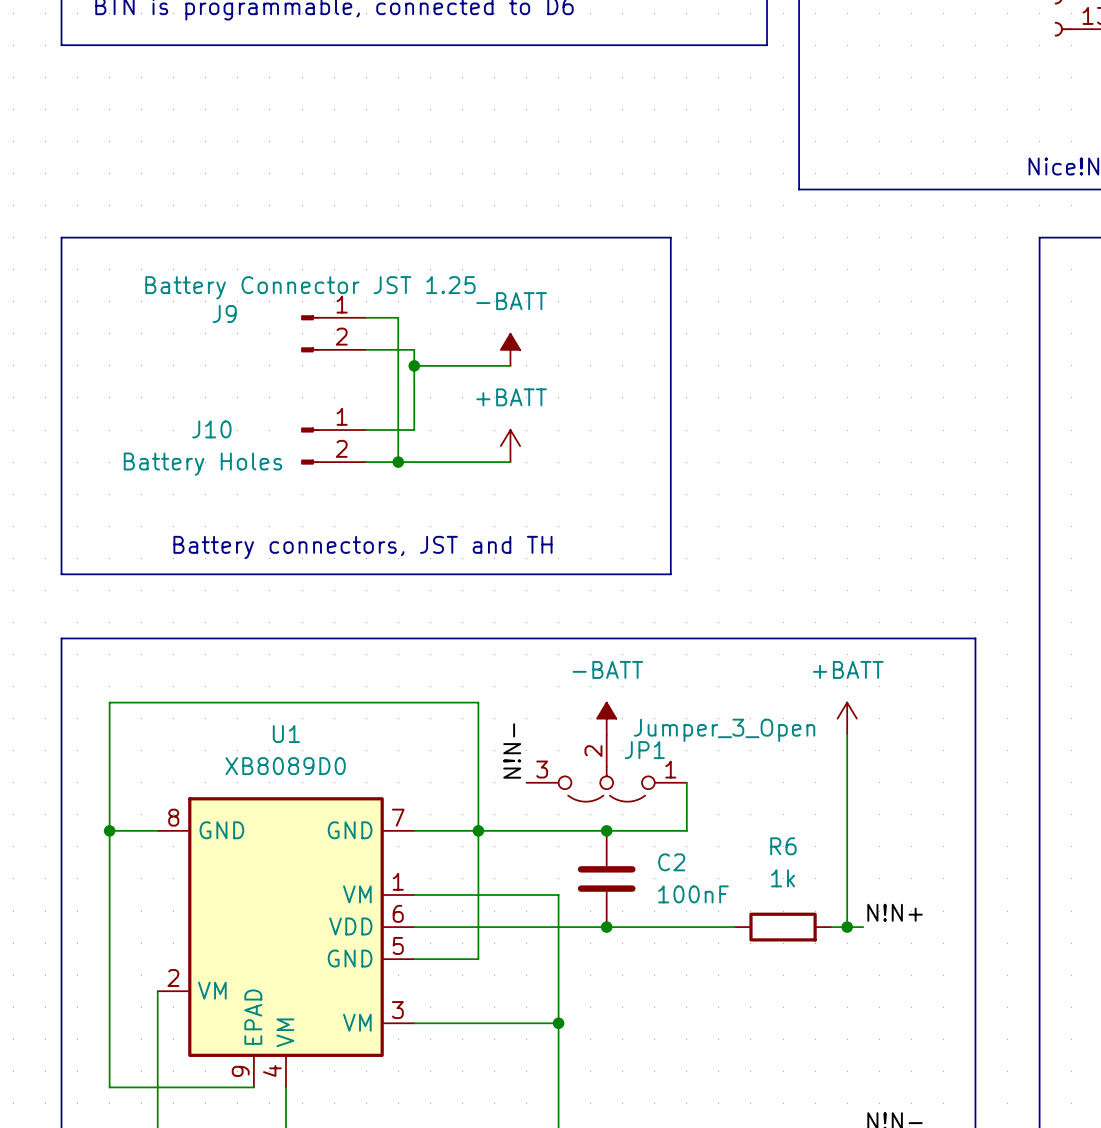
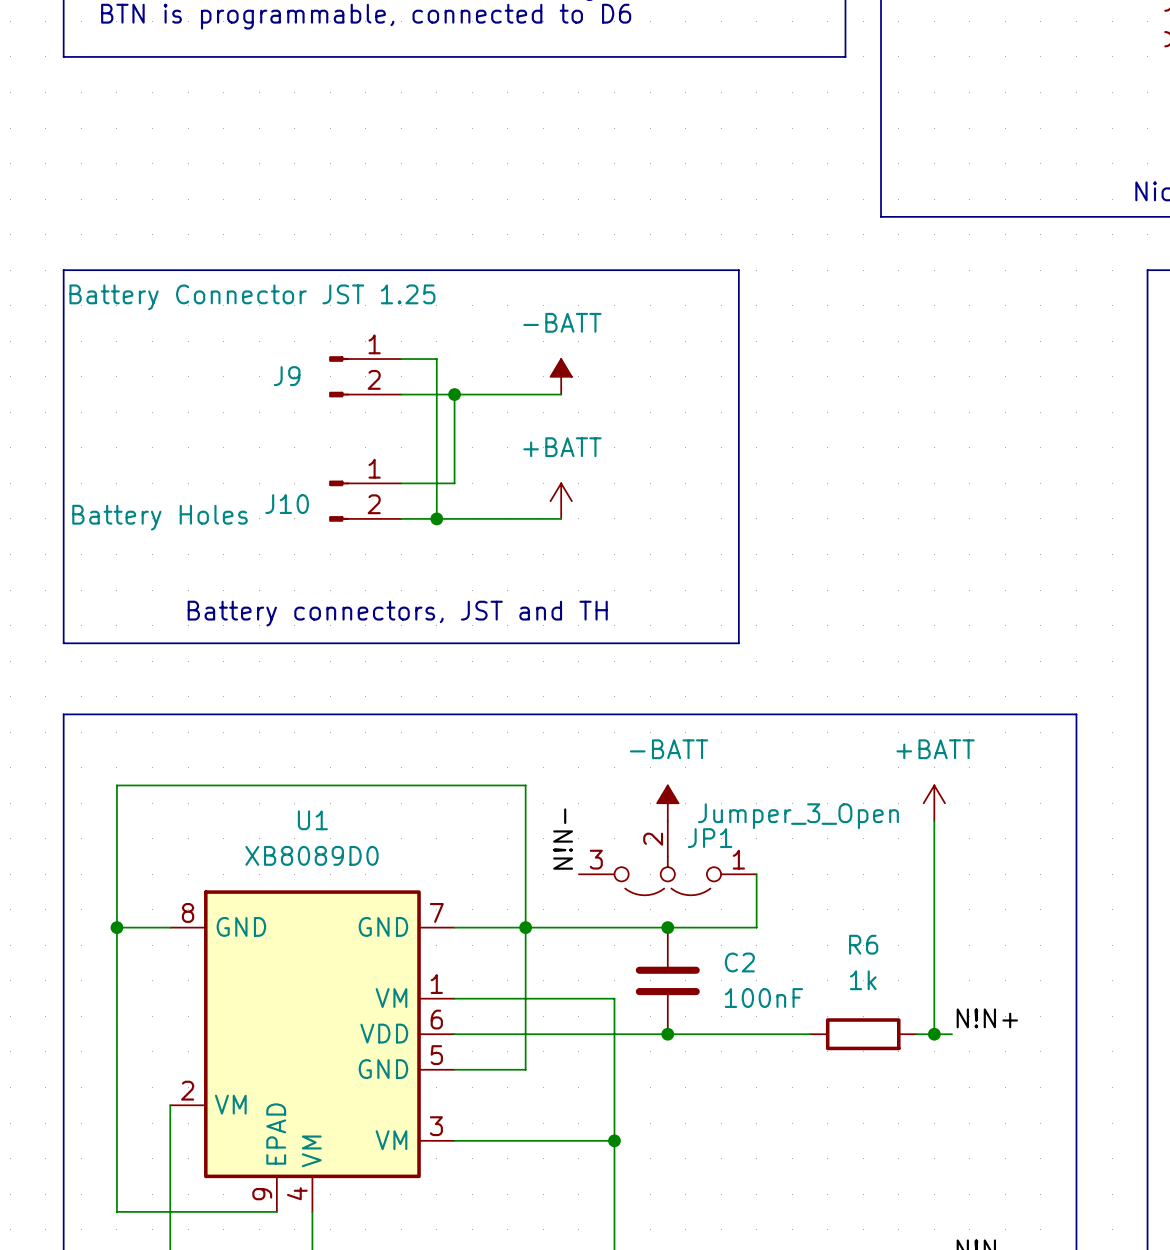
J9 value position: Battery Connector JST 1.25 (310, 287) -> Battery Connector JST 1.25 (252, 297)
J9 name position: J9 (224, 313) -> J9 (287, 376)
power symbol position: -BATT (510, 349) -> -BATT (561, 376)
wire: (414, 365) (510, 365) -> (454, 394) (561, 394)
junction position: (414, 365) -> (454, 394)
J10 name position: J10 (211, 429) -> J10 (287, 504)
J10 value position: Battery Holes (203, 464) -> Battery Holes (160, 517)

